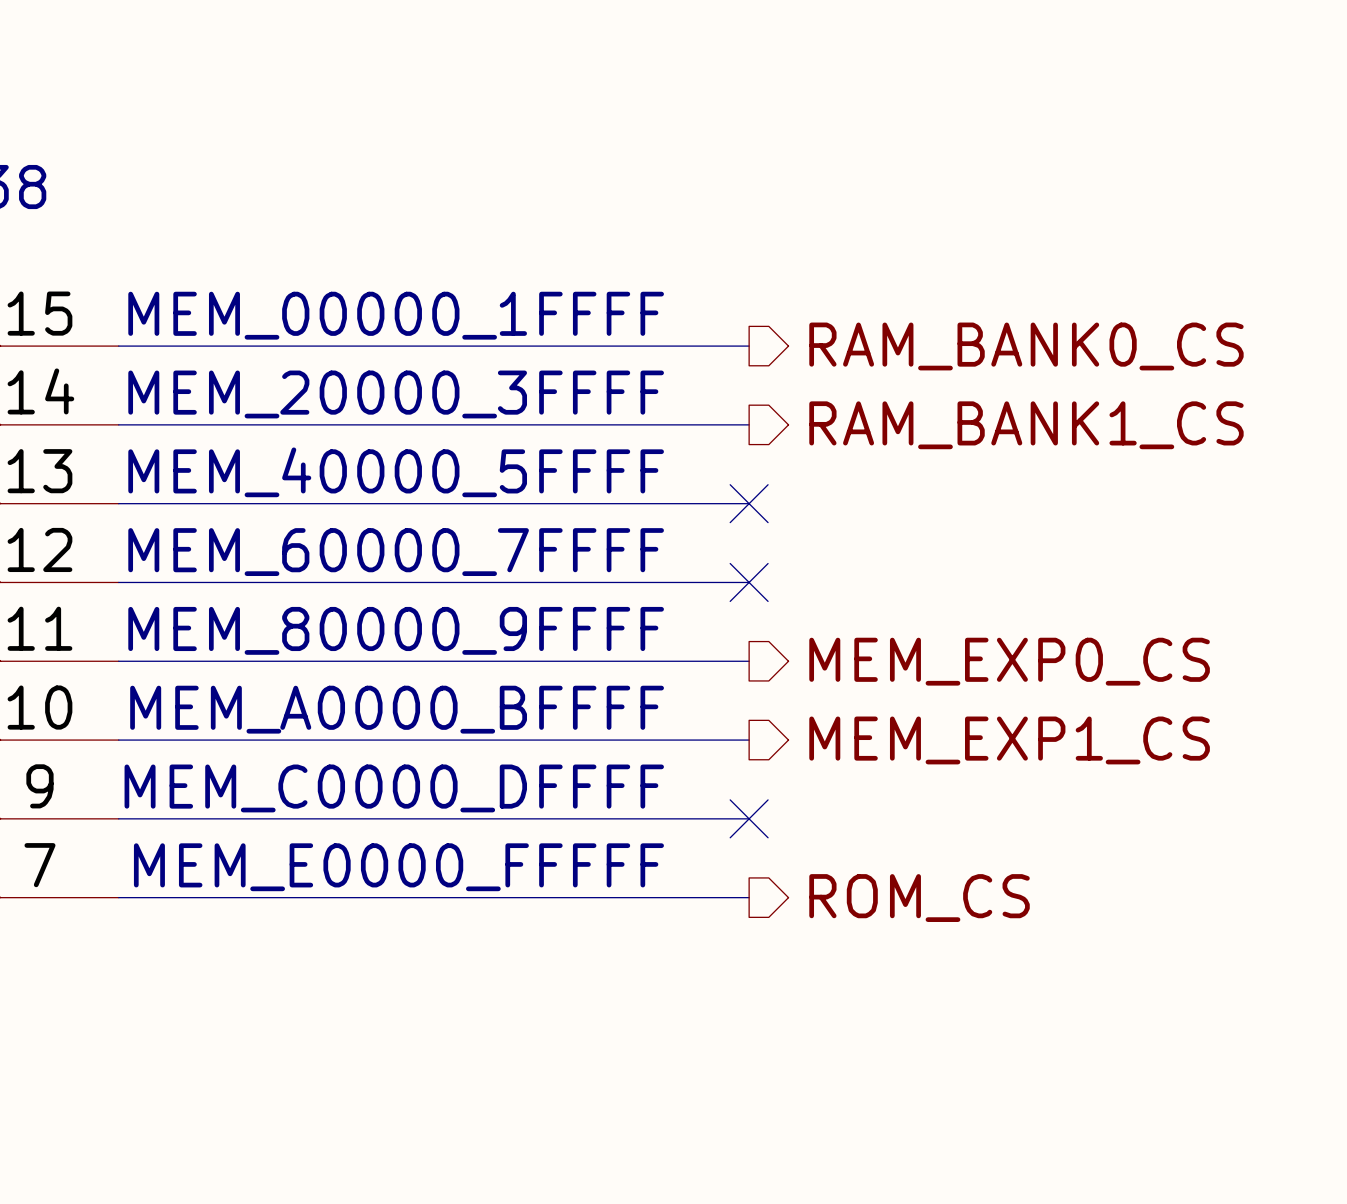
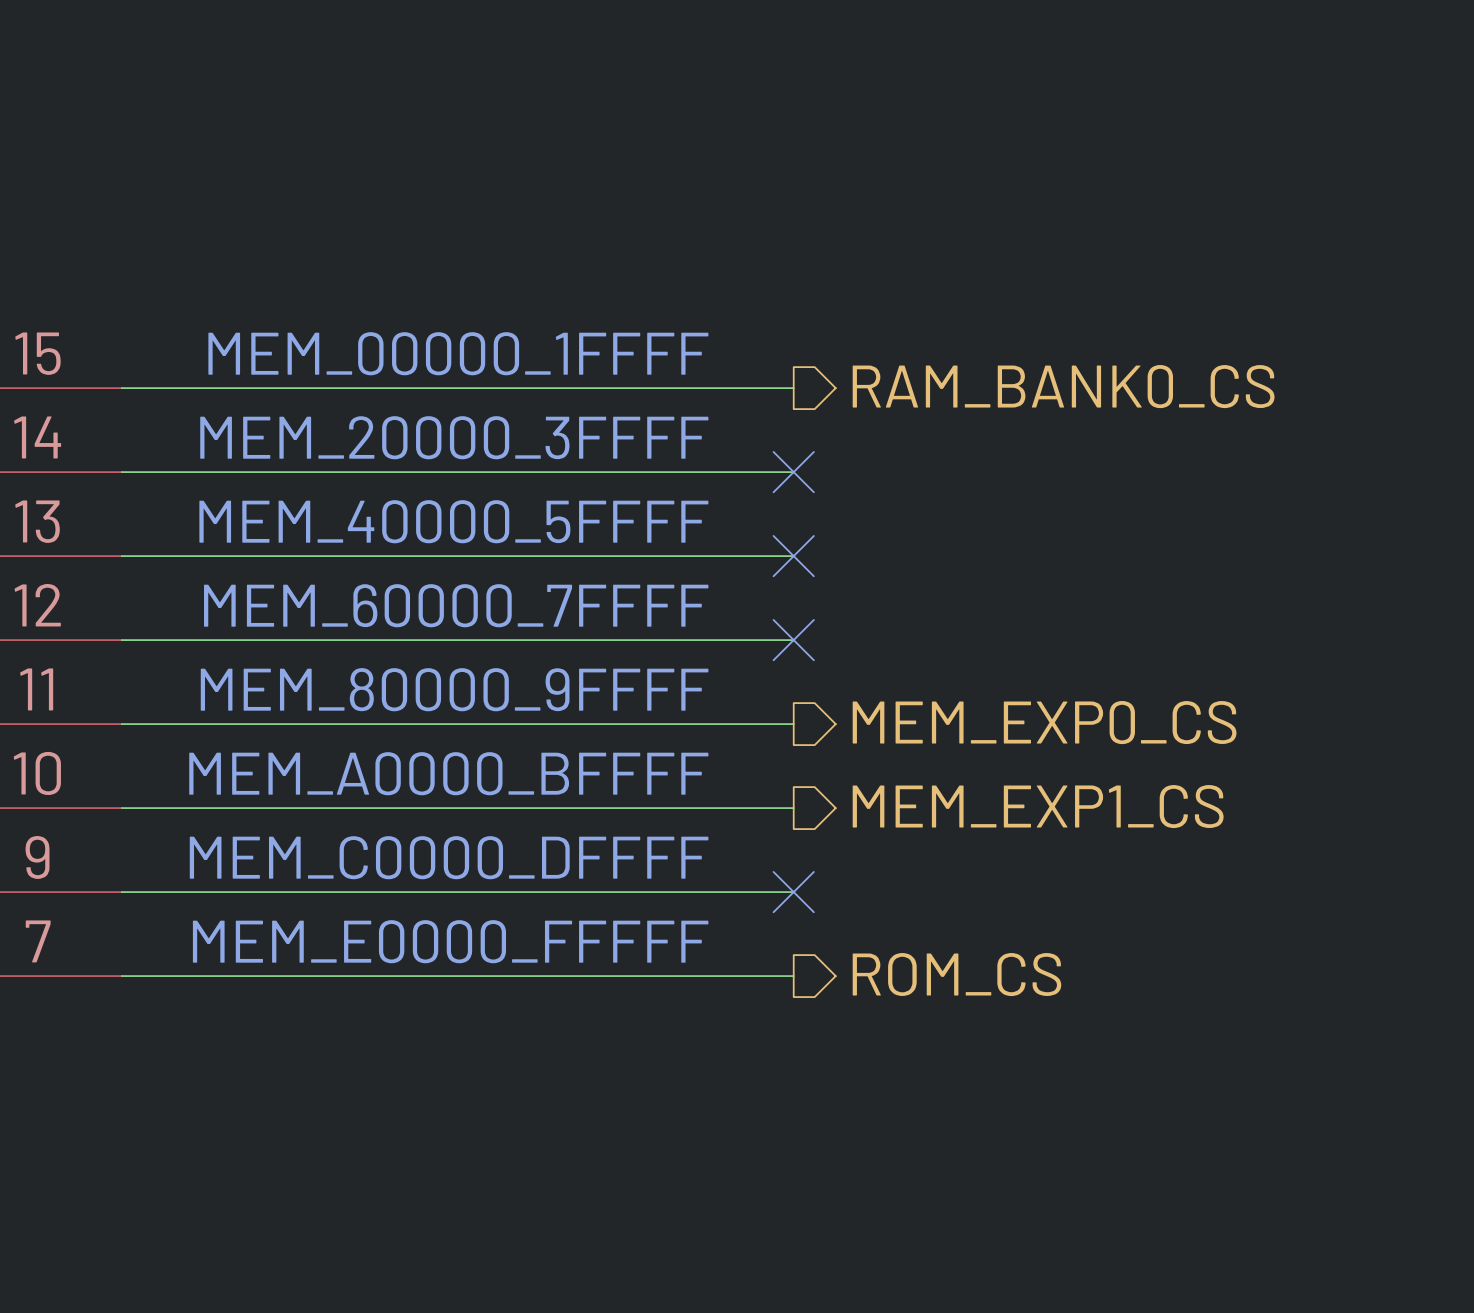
no-connect mark: none -> (793, 472)
hierarchical label: RAM_BANK1_CS (1026, 425) -> none

